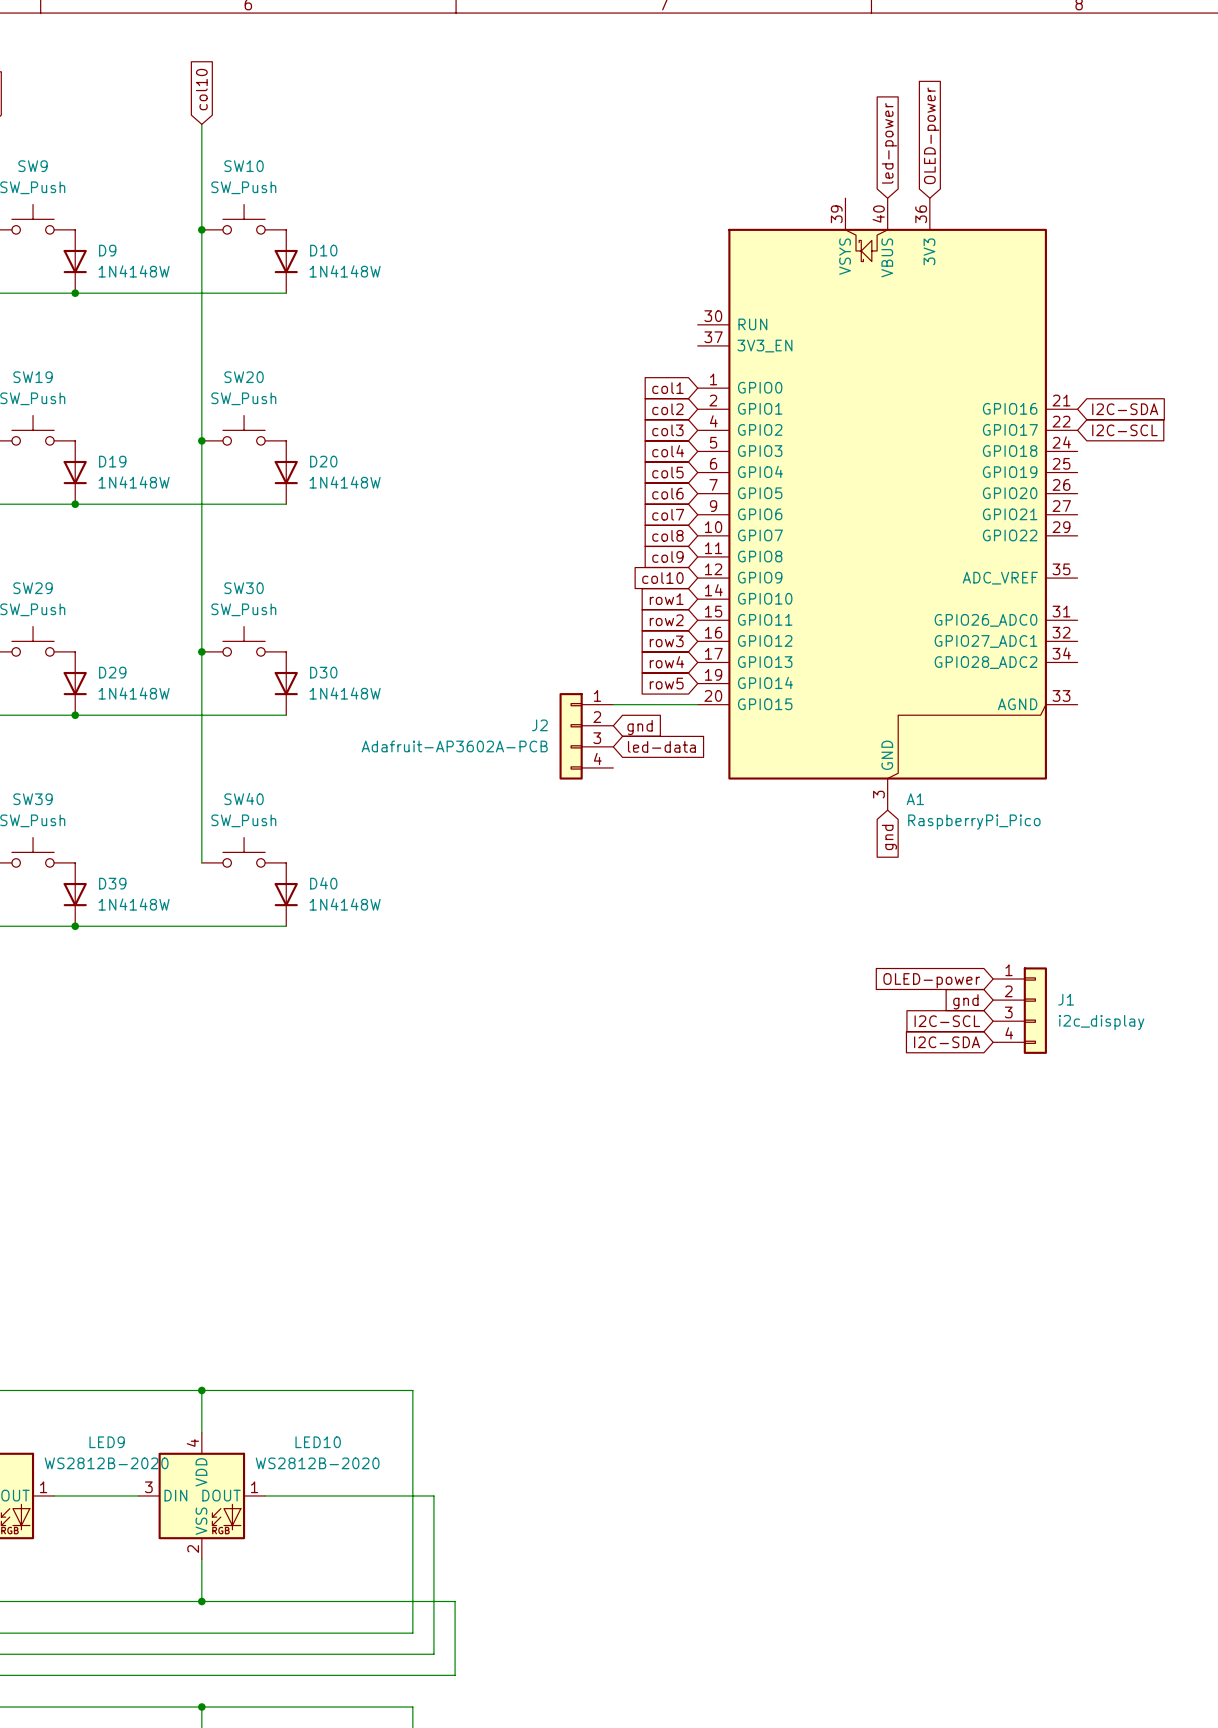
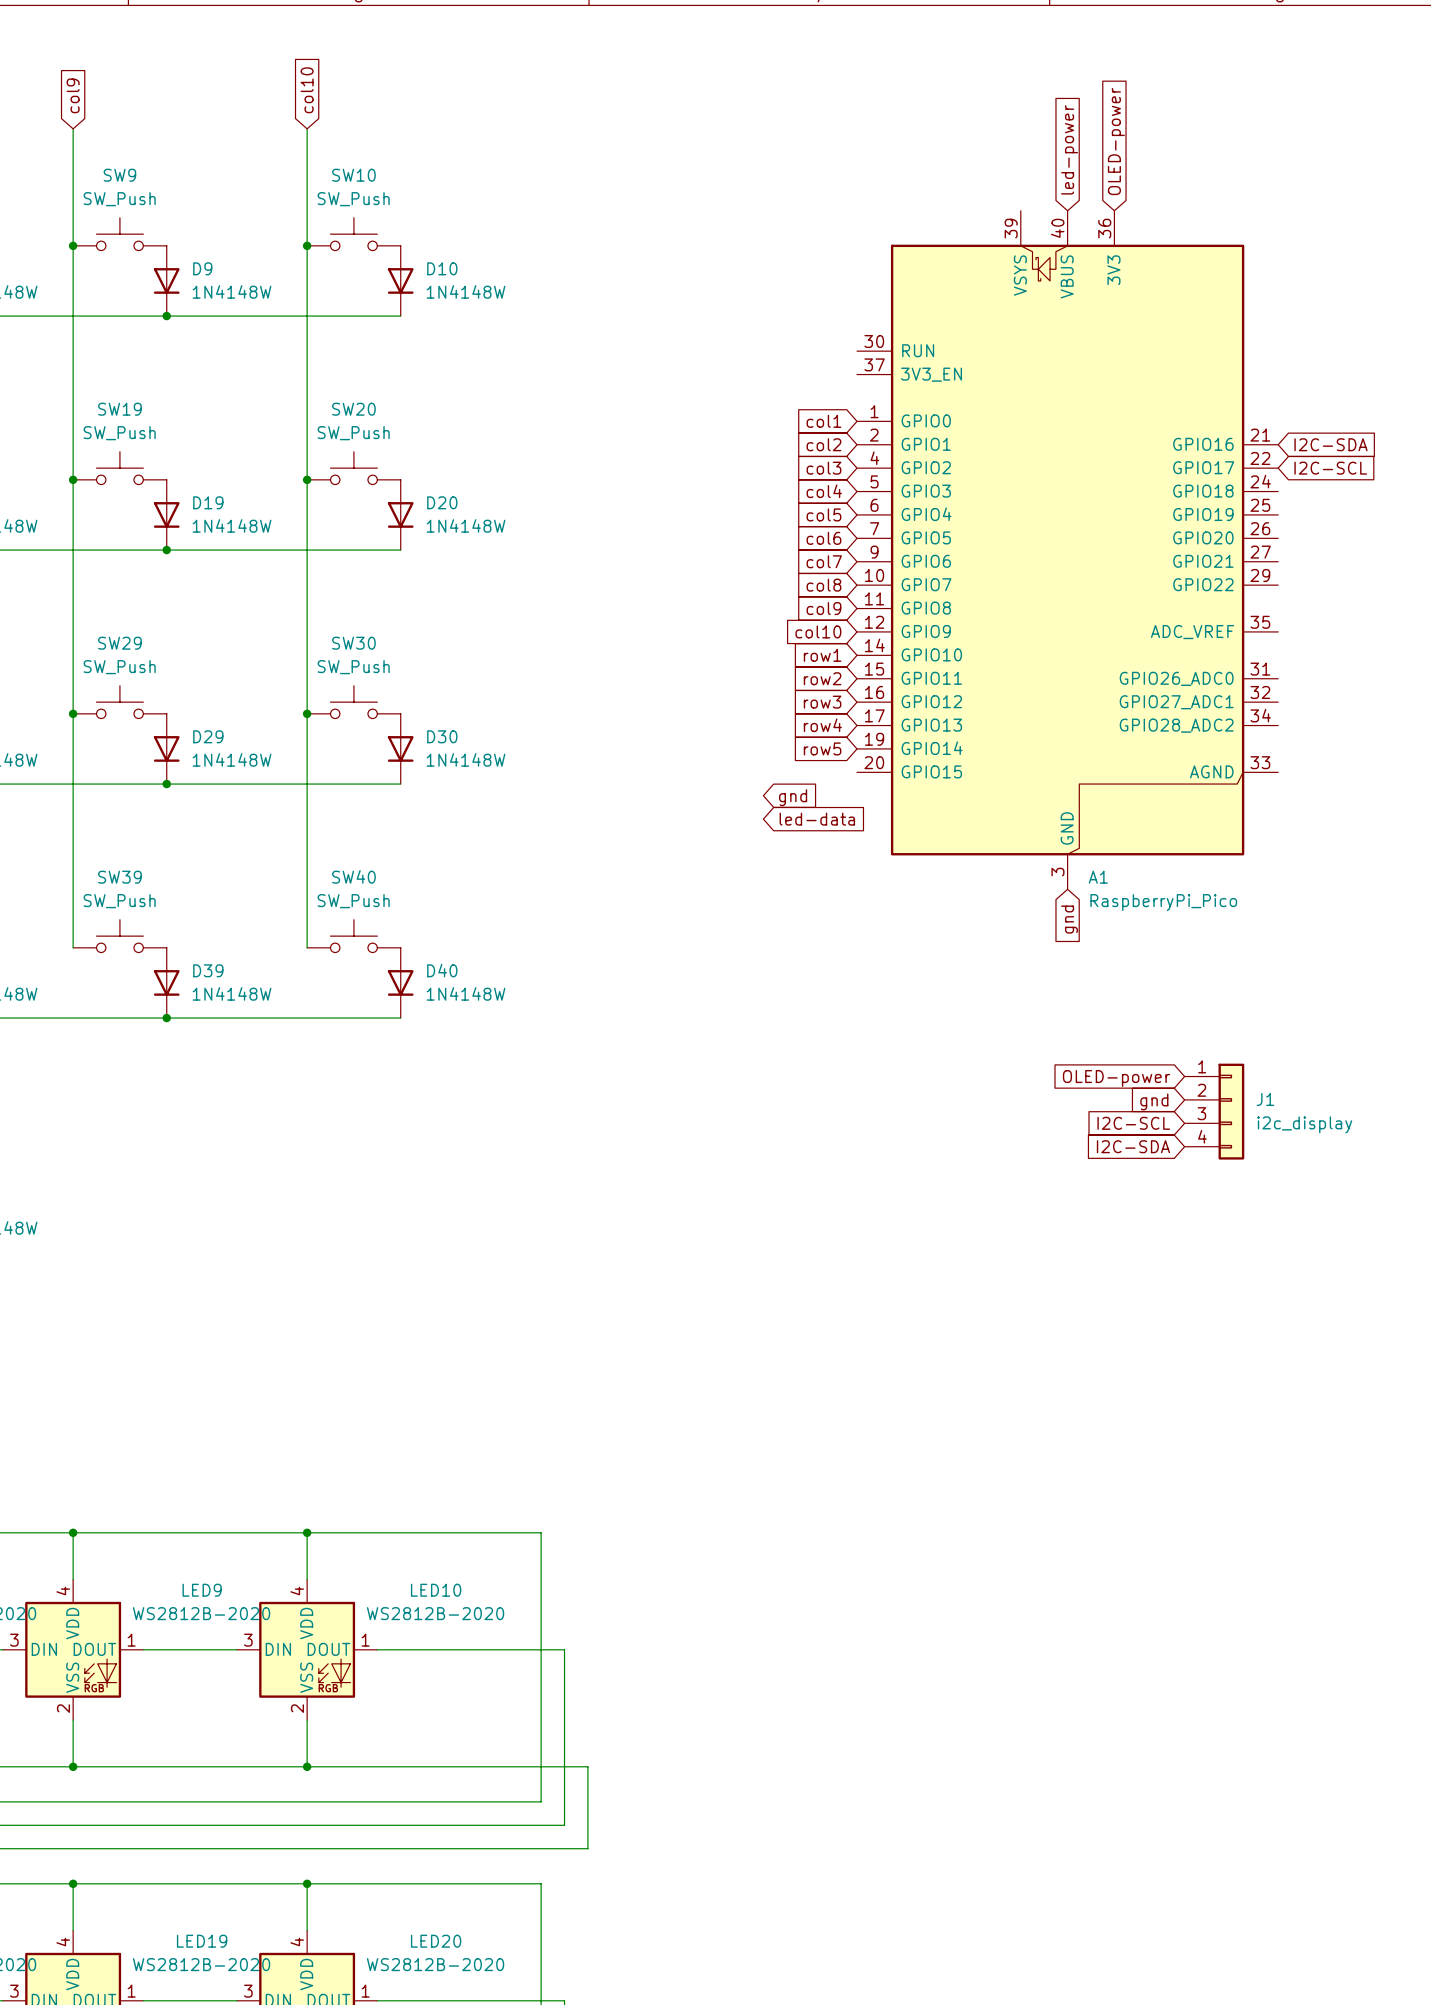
wire: (613, 704) (697, 704) -> none
J2: Adafruit-AP3602A-PCB (586, 736) -> none

